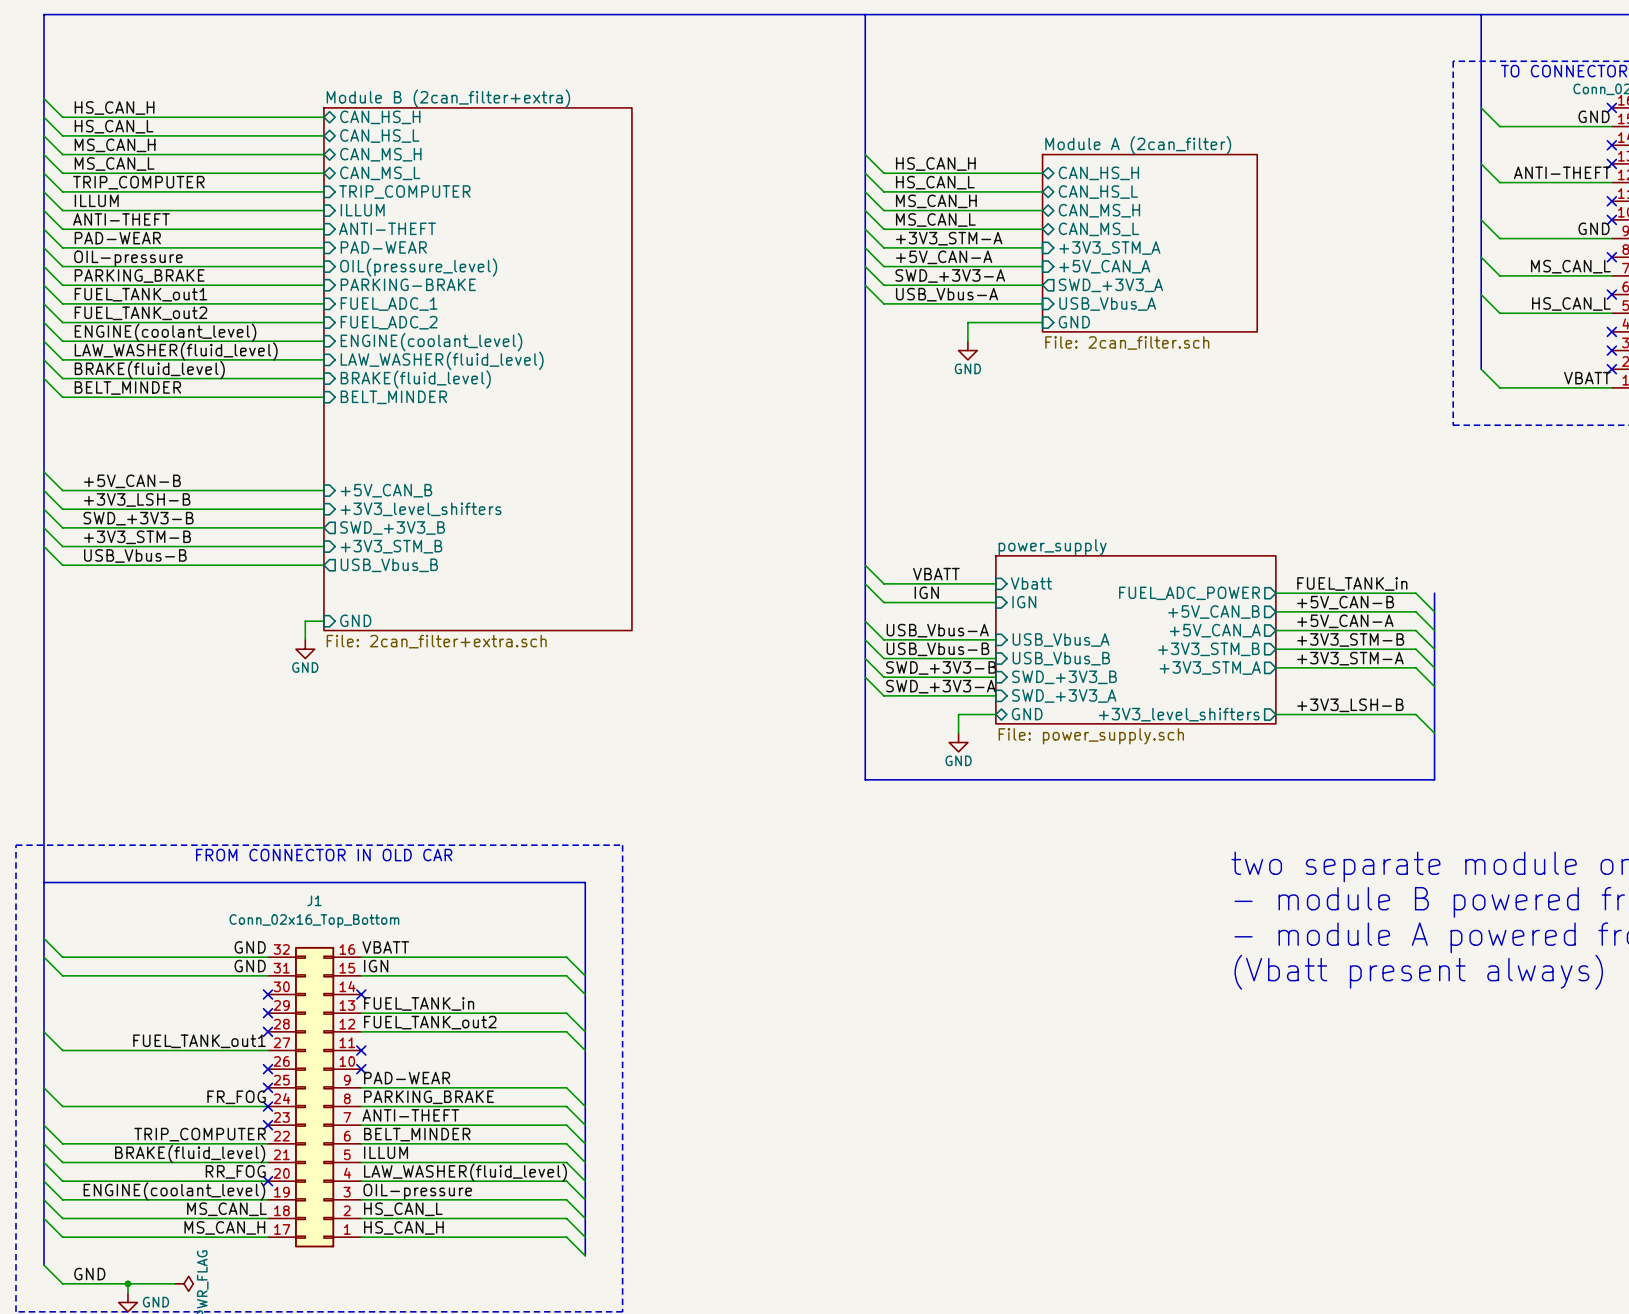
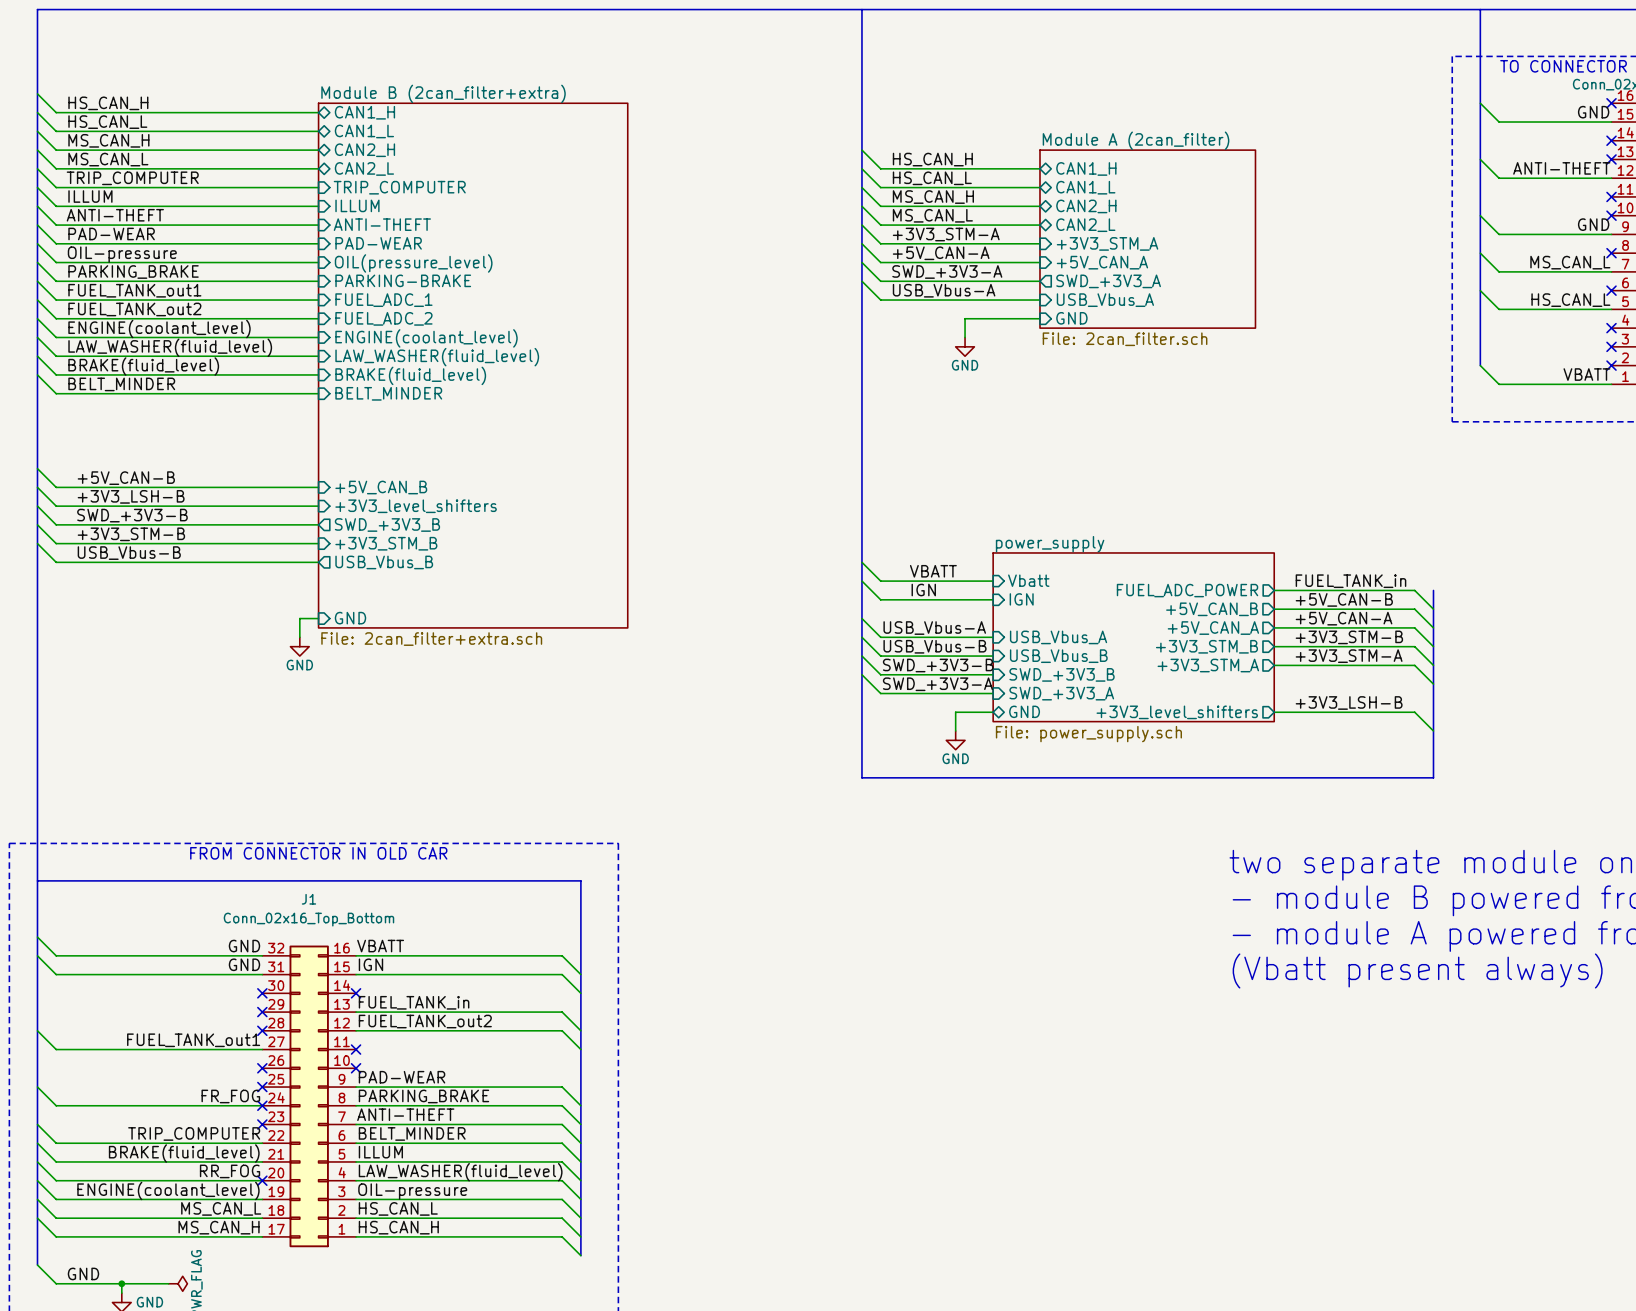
sheet pin: CAN_HS_H (380, 117) -> CAN1_H (364, 112)
sheet pin: CAN_HS_L (379, 136) -> CAN1_L (364, 131)
sheet pin: CAN_MS_H (380, 154) -> CAN2_H (364, 150)
sheet pin: CAN_MS_L (380, 173) -> CAN2_L (364, 168)
sheet pin: CAN_HS_H (1098, 173) -> CAN1_H (1086, 168)
sheet pin: CAN_HS_L (1098, 192) -> CAN1_L (1085, 187)
sheet pin: CAN_MS_H (1099, 210) -> CAN2_H (1086, 206)
sheet pin: CAN_MS_L (1098, 229) -> CAN2_L (1085, 225)

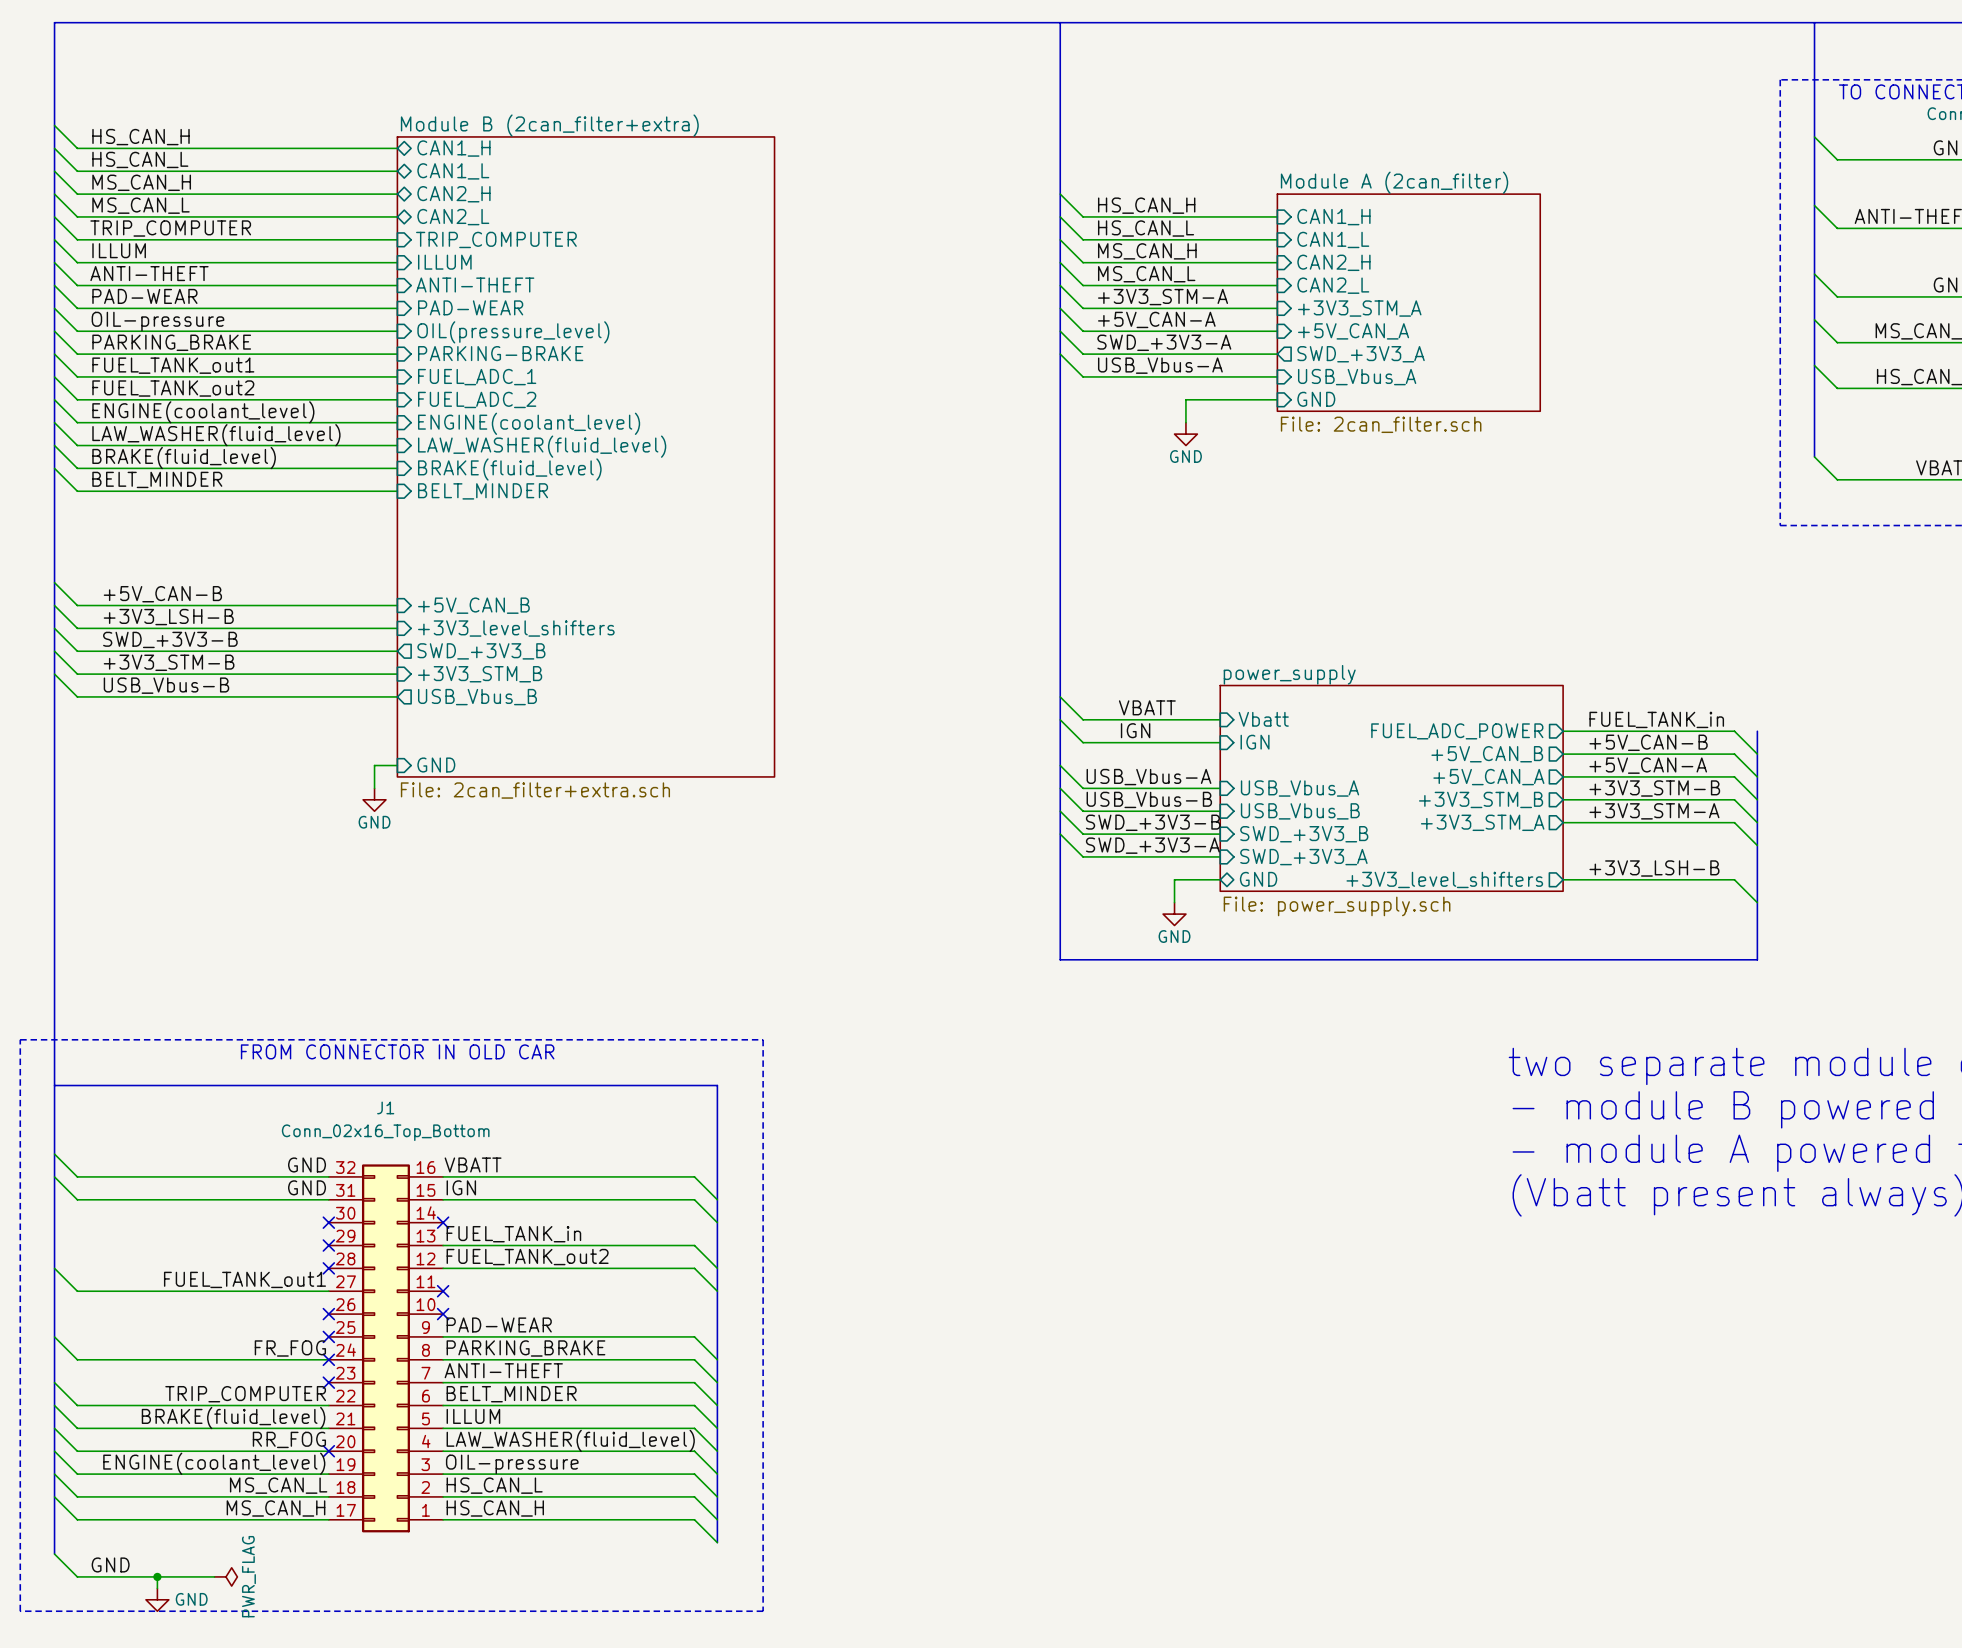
sheet pin shape: bidirectional (1086, 168) -> input (1333, 217)
sheet pin shape: bidirectional (1085, 187) -> input (1333, 239)
sheet pin shape: bidirectional (1086, 206) -> input (1333, 262)
sheet pin shape: bidirectional (1085, 225) -> input (1333, 285)

